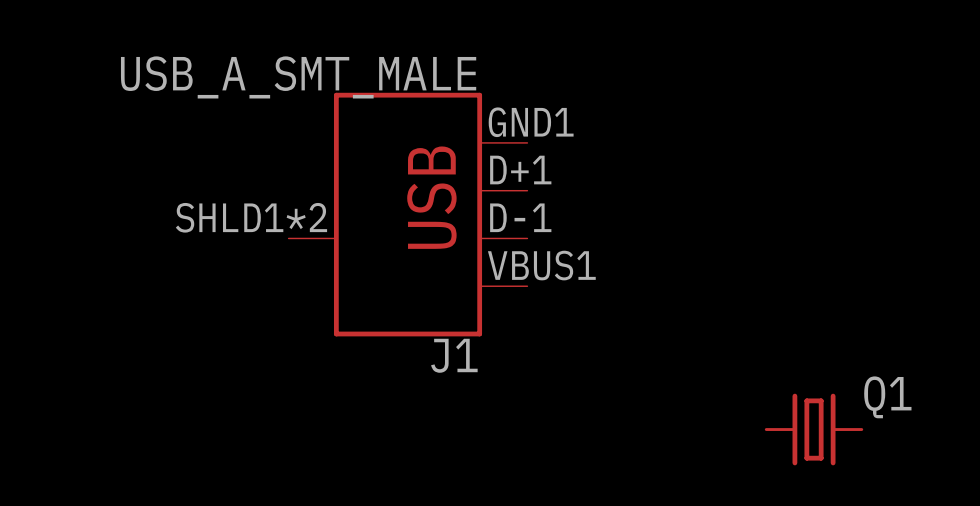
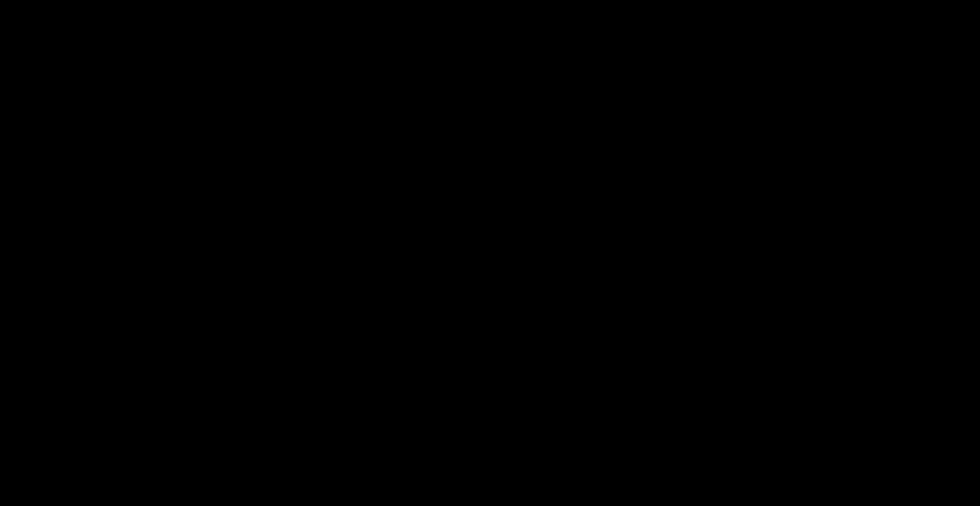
J1: USB_A_SMT_MALE (408, 214) -> none
Q1: (814, 429) -> none

